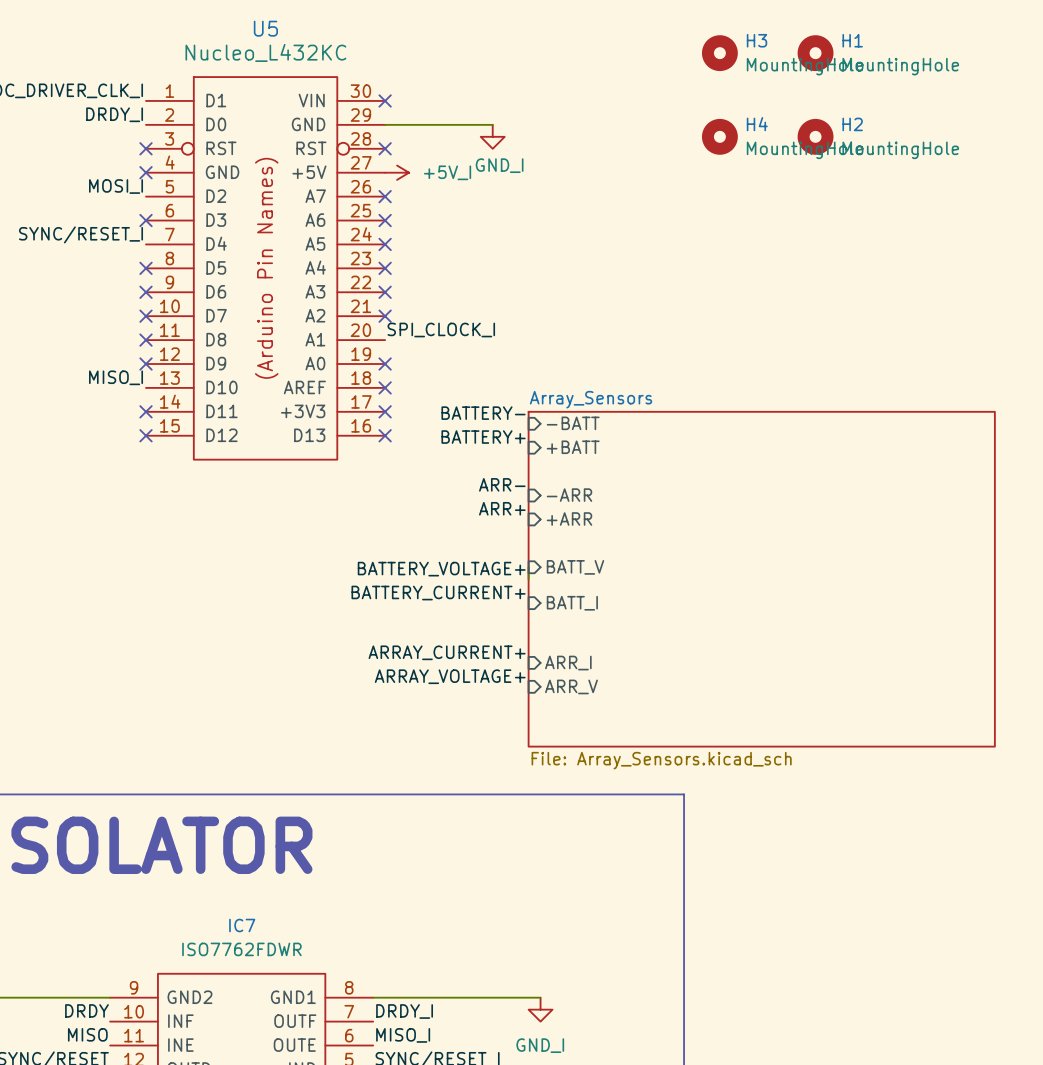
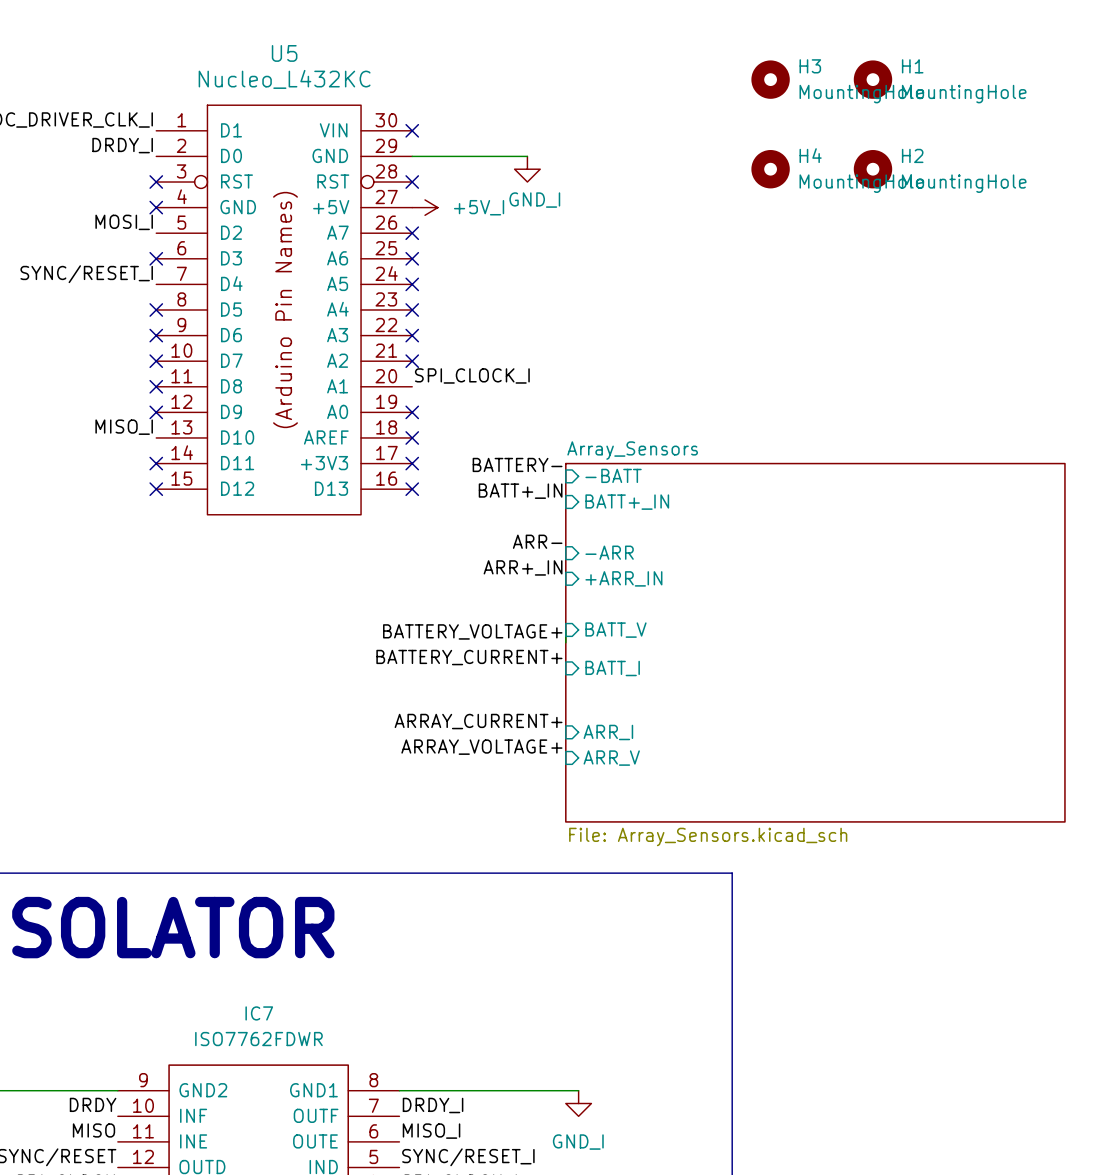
label: BATTERY+ (483, 437) -> BATT+_IN (520, 491)
sheet pin: +BATT (573, 447) -> BATT+_IN (627, 502)
label: ARR+ (502, 508) -> ARR+_IN (523, 567)
sheet pin: +ARR (569, 518) -> +ARR_IN (623, 578)

